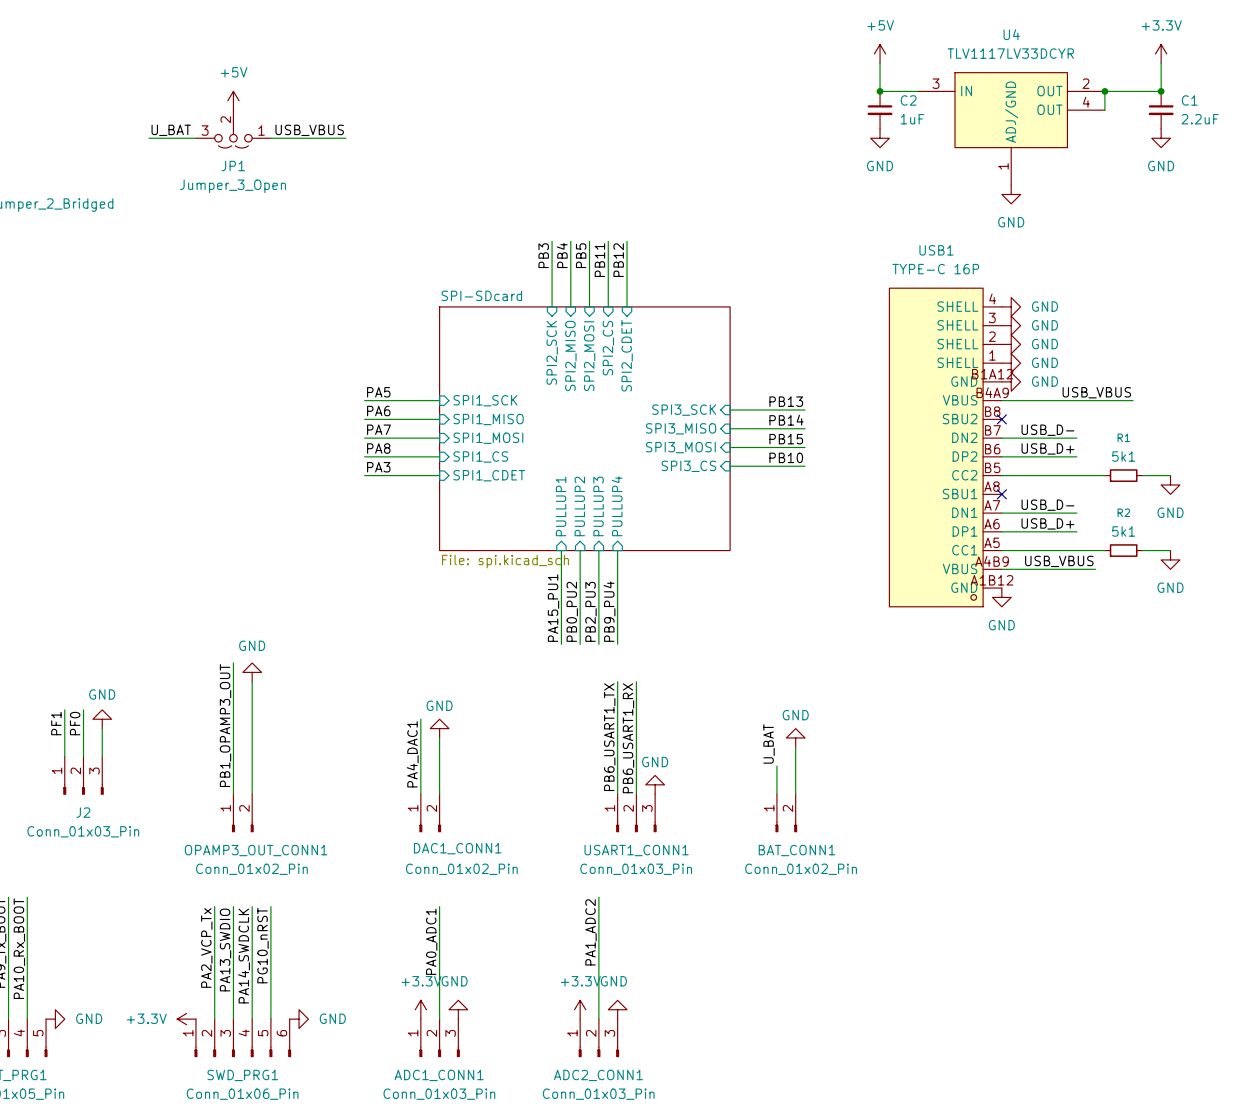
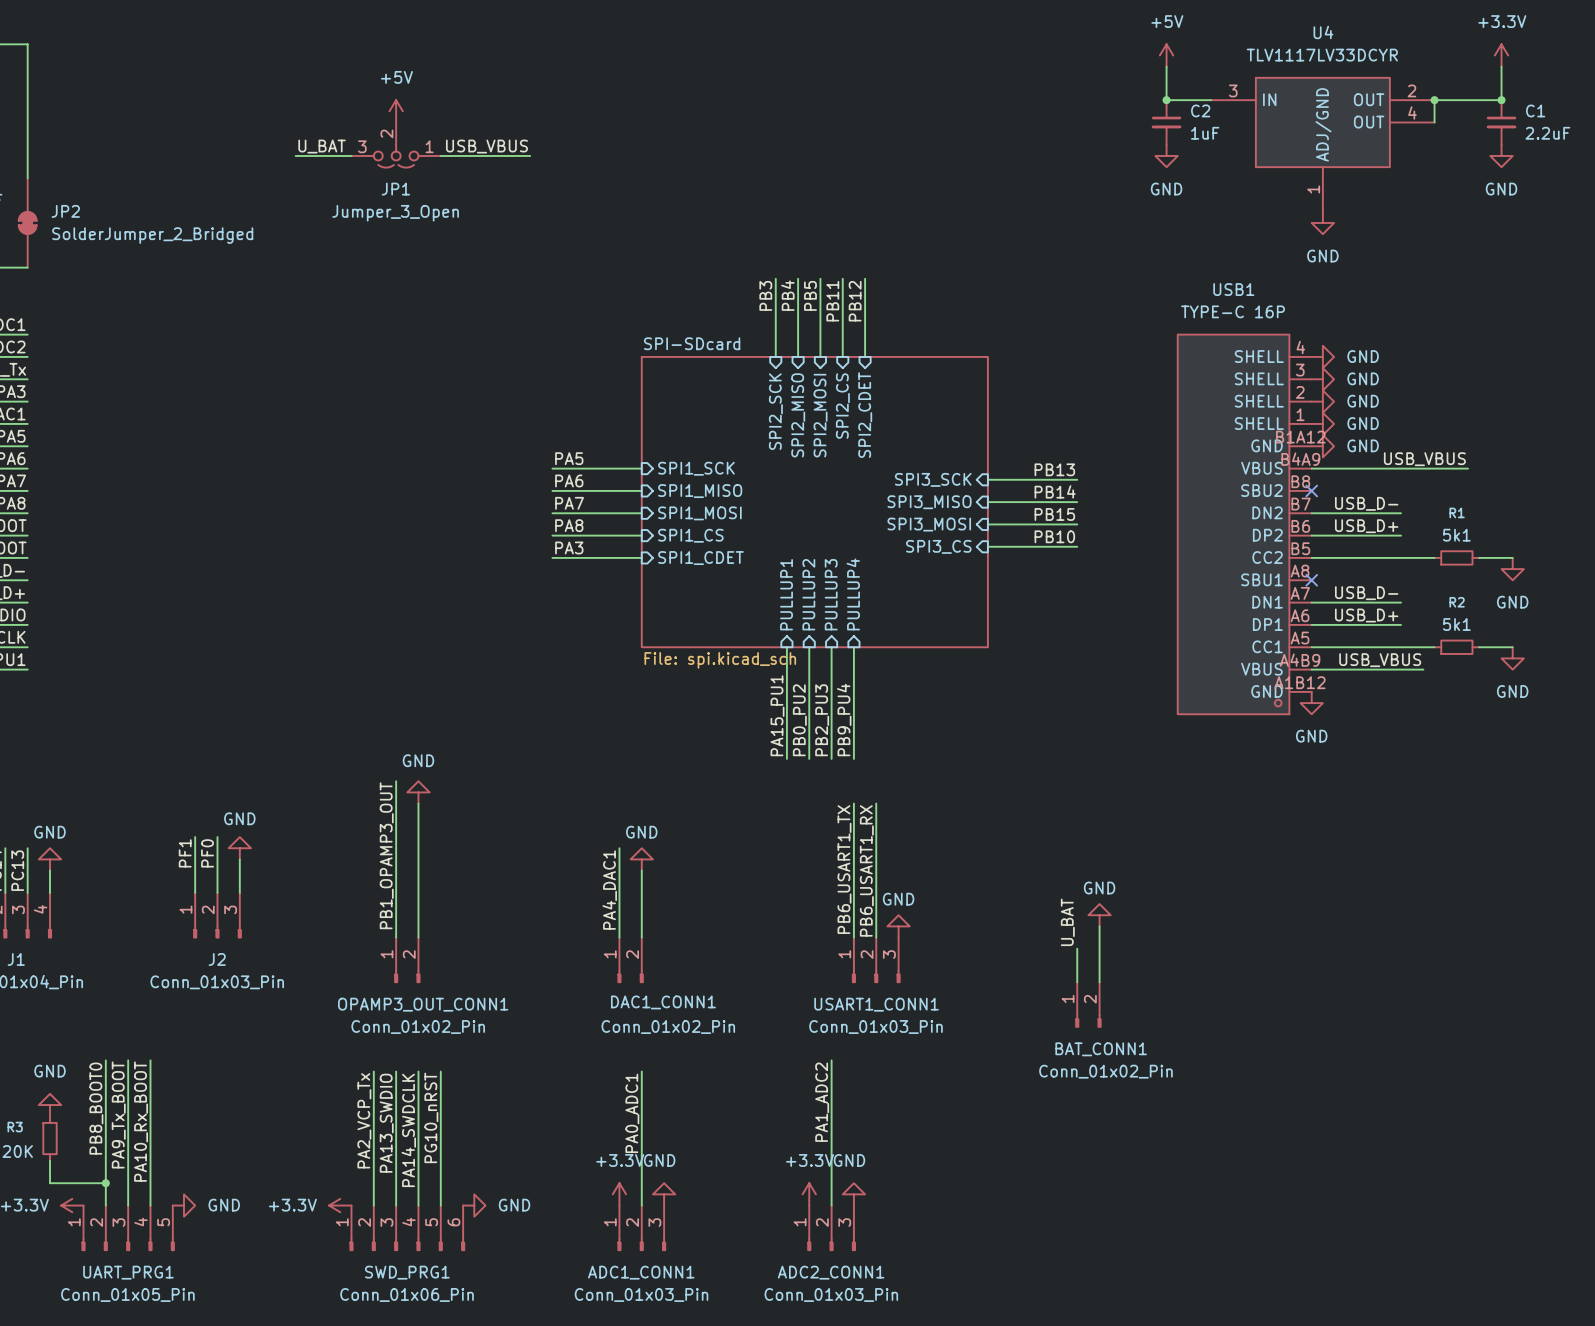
power symbol position: GND (795, 737) -> GND (1099, 915)
label position: U_BAT (769, 743) -> U_BAT (1067, 922)
wire: (795, 747) (795, 794) -> (1099, 926) (1099, 982)
wire: (776, 766) (776, 794) -> (1077, 948) (1077, 982)
BAT_CONN1 position: (786, 813) -> (1088, 1004)

